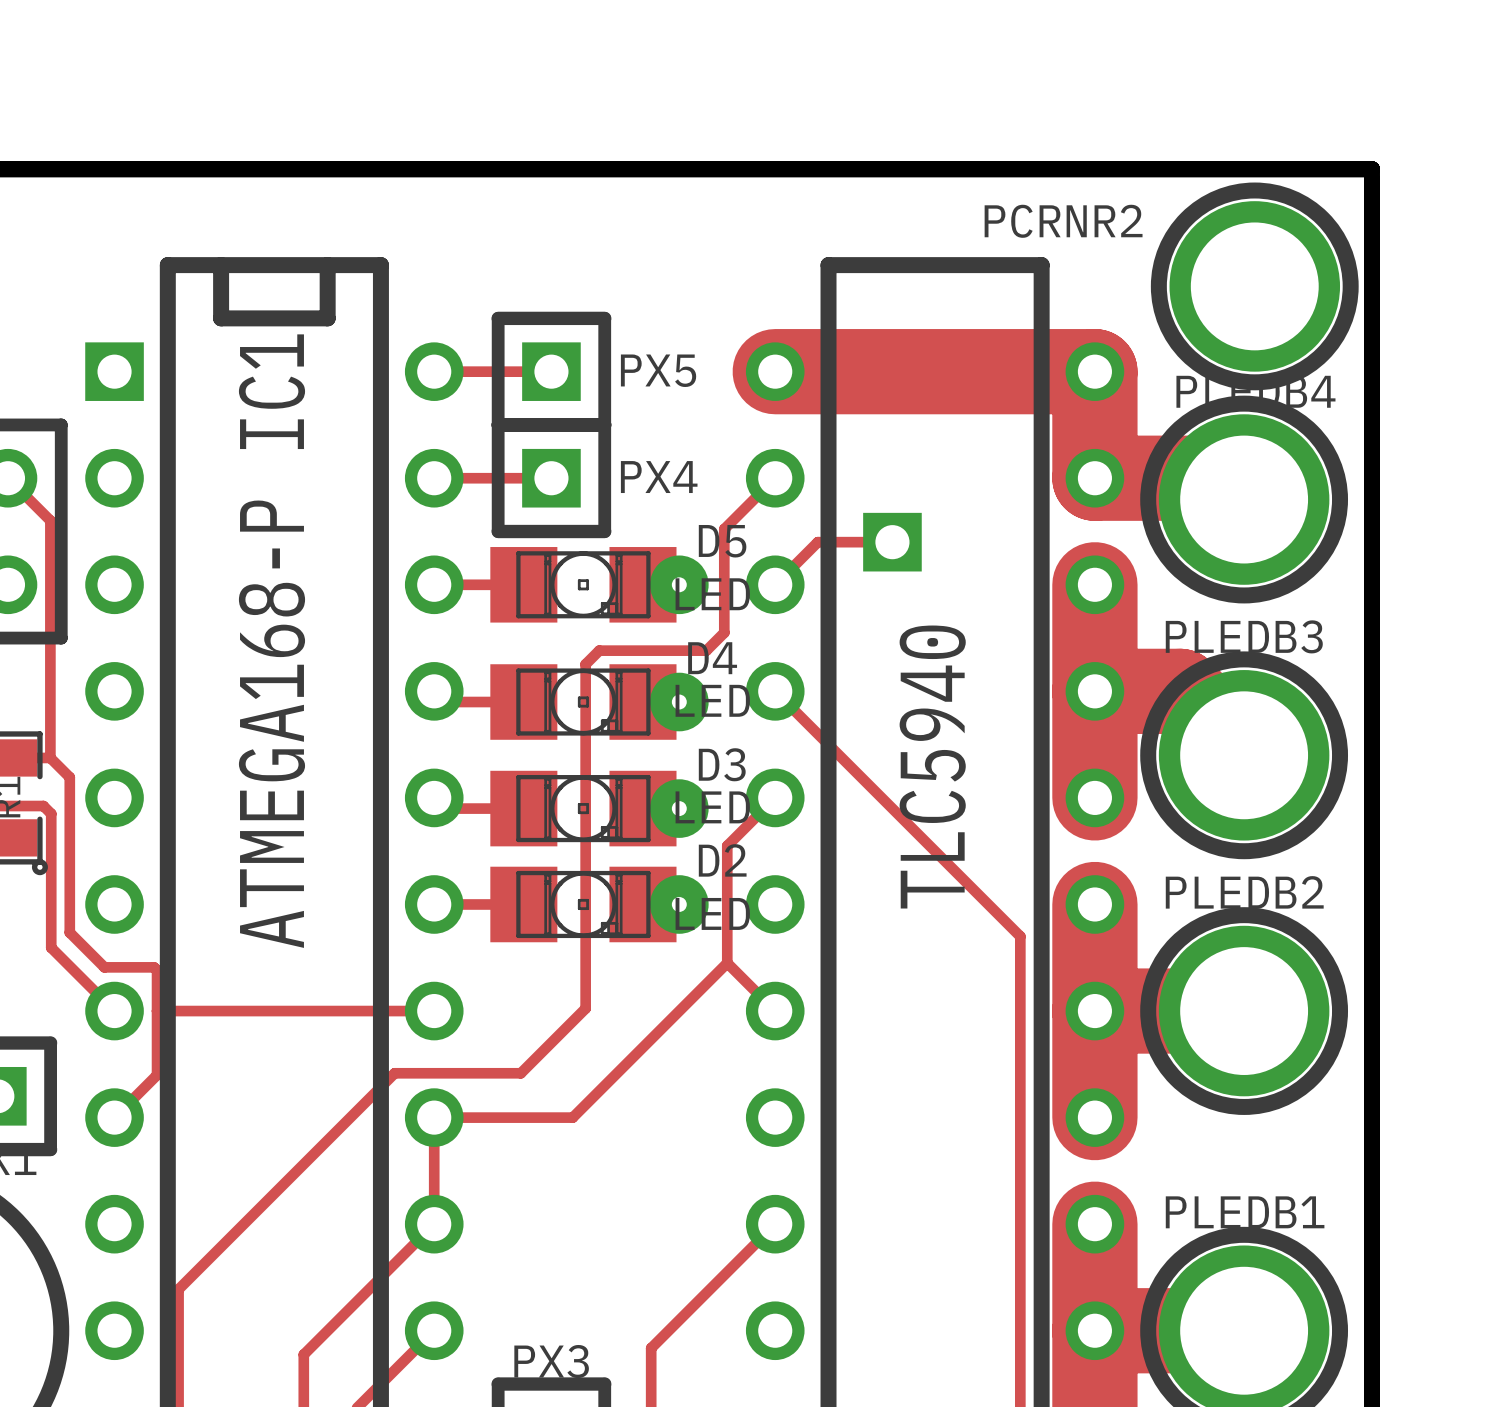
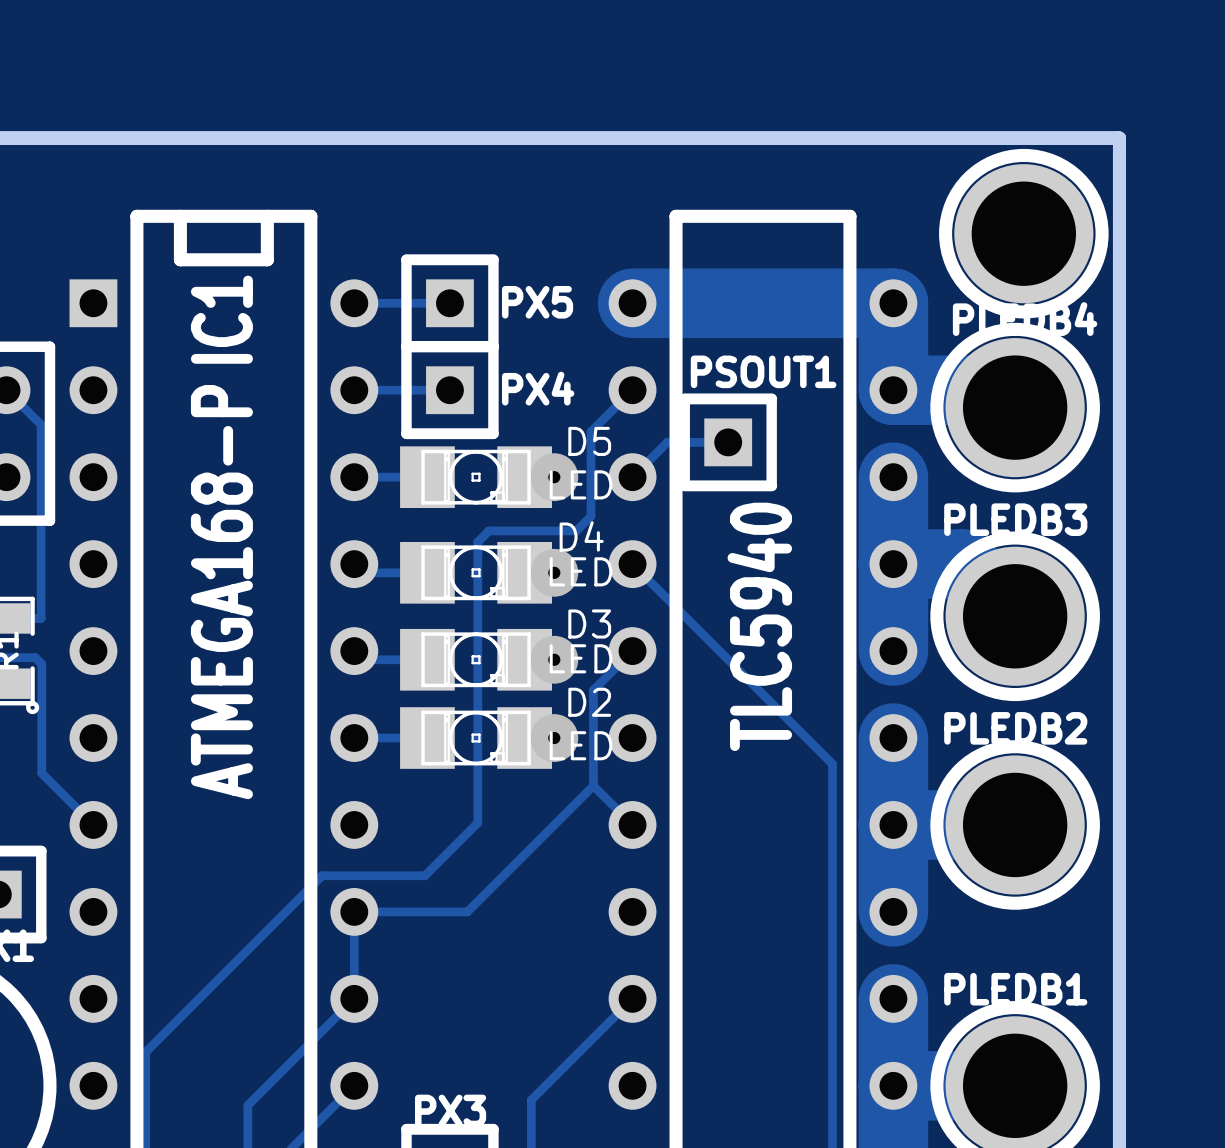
PCRNR2 name: PCRNR2 (1063, 221) -> none
PSOUT1 side: bottom (892, 542) -> top (728, 442)
track: (50, 757) (69, 777) (69, 932) (104, 967) (154, 967) (157, 970) (157, 1075) (114, 1117) -> none
track: (157, 1011) (434, 1011) -> none

